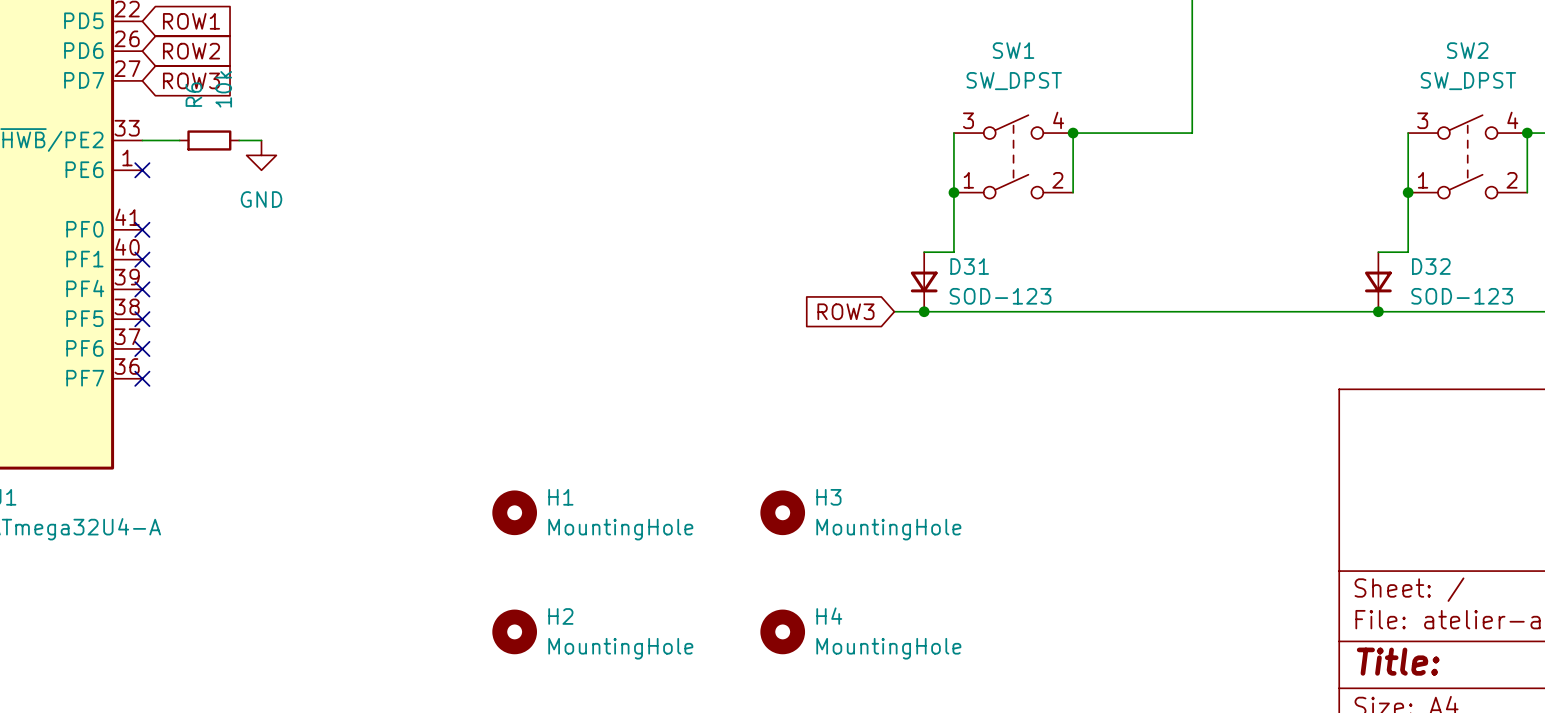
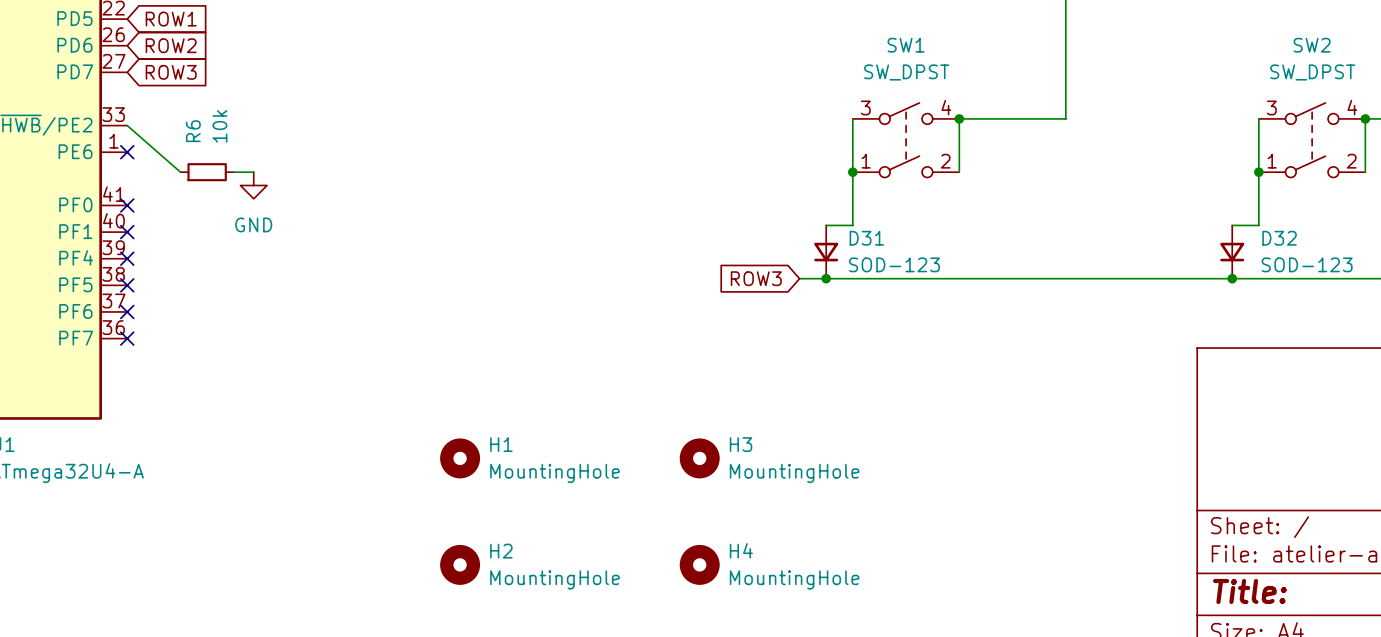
wire: (142, 140) (179, 140) -> (127, 125) (180, 172)
R6 position: (209, 140) -> (207, 172)
wire: (239, 140) (261, 140) -> (233, 172) (253, 172)
power symbol position: GND (261, 155) -> GND (253, 185)

